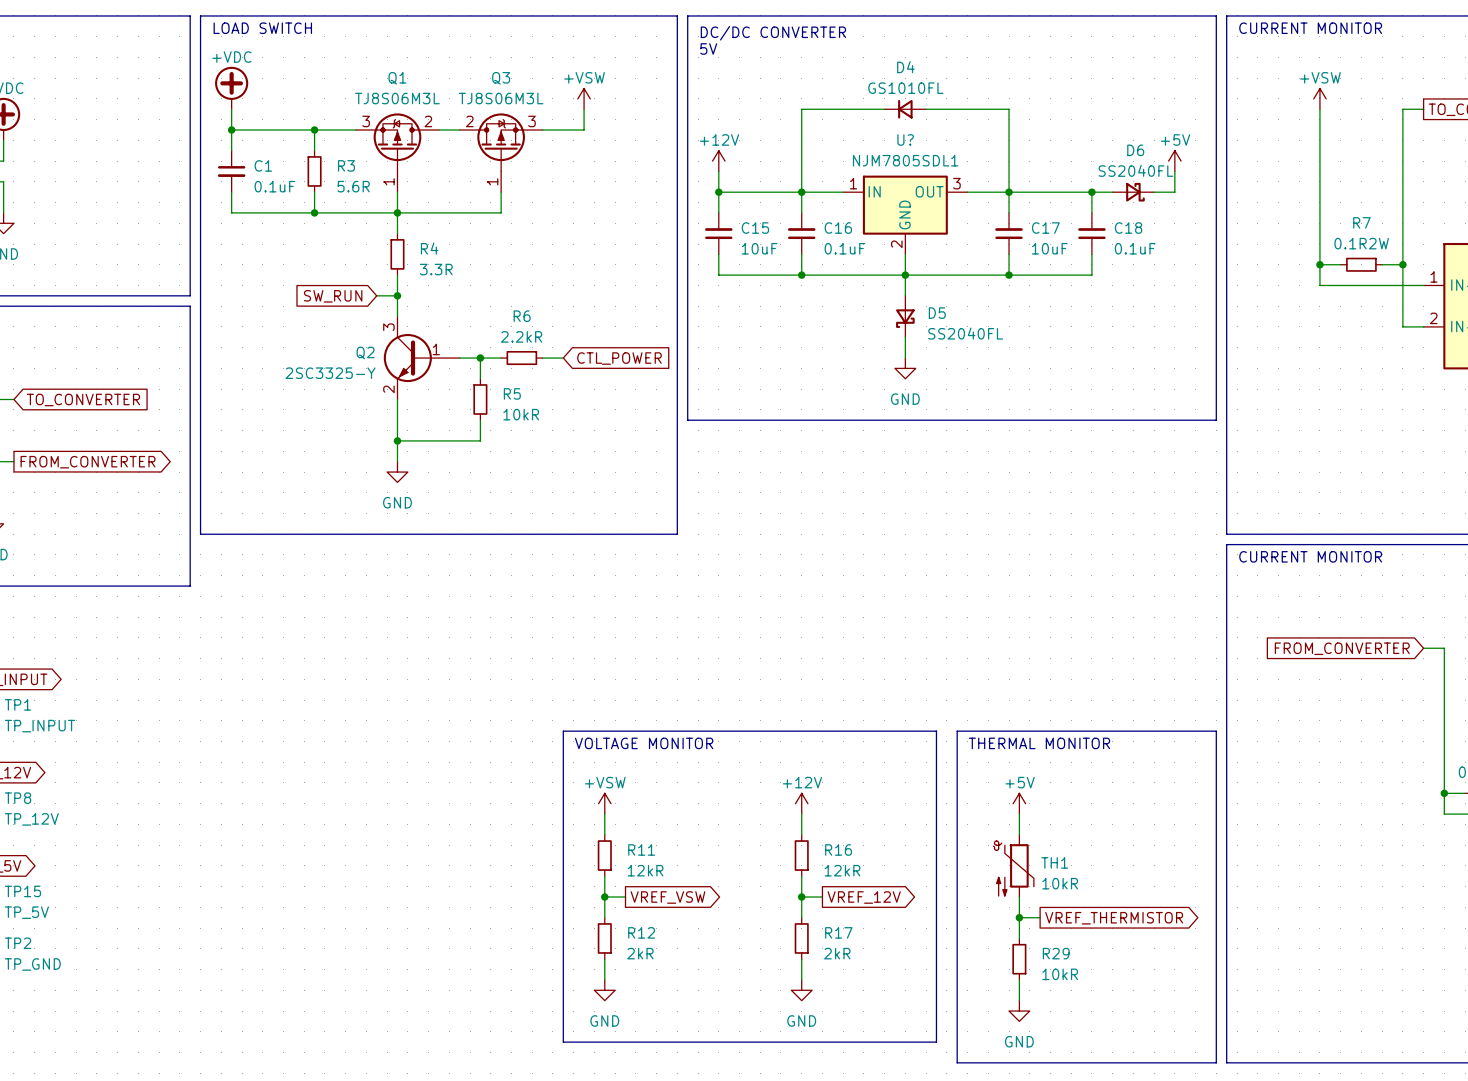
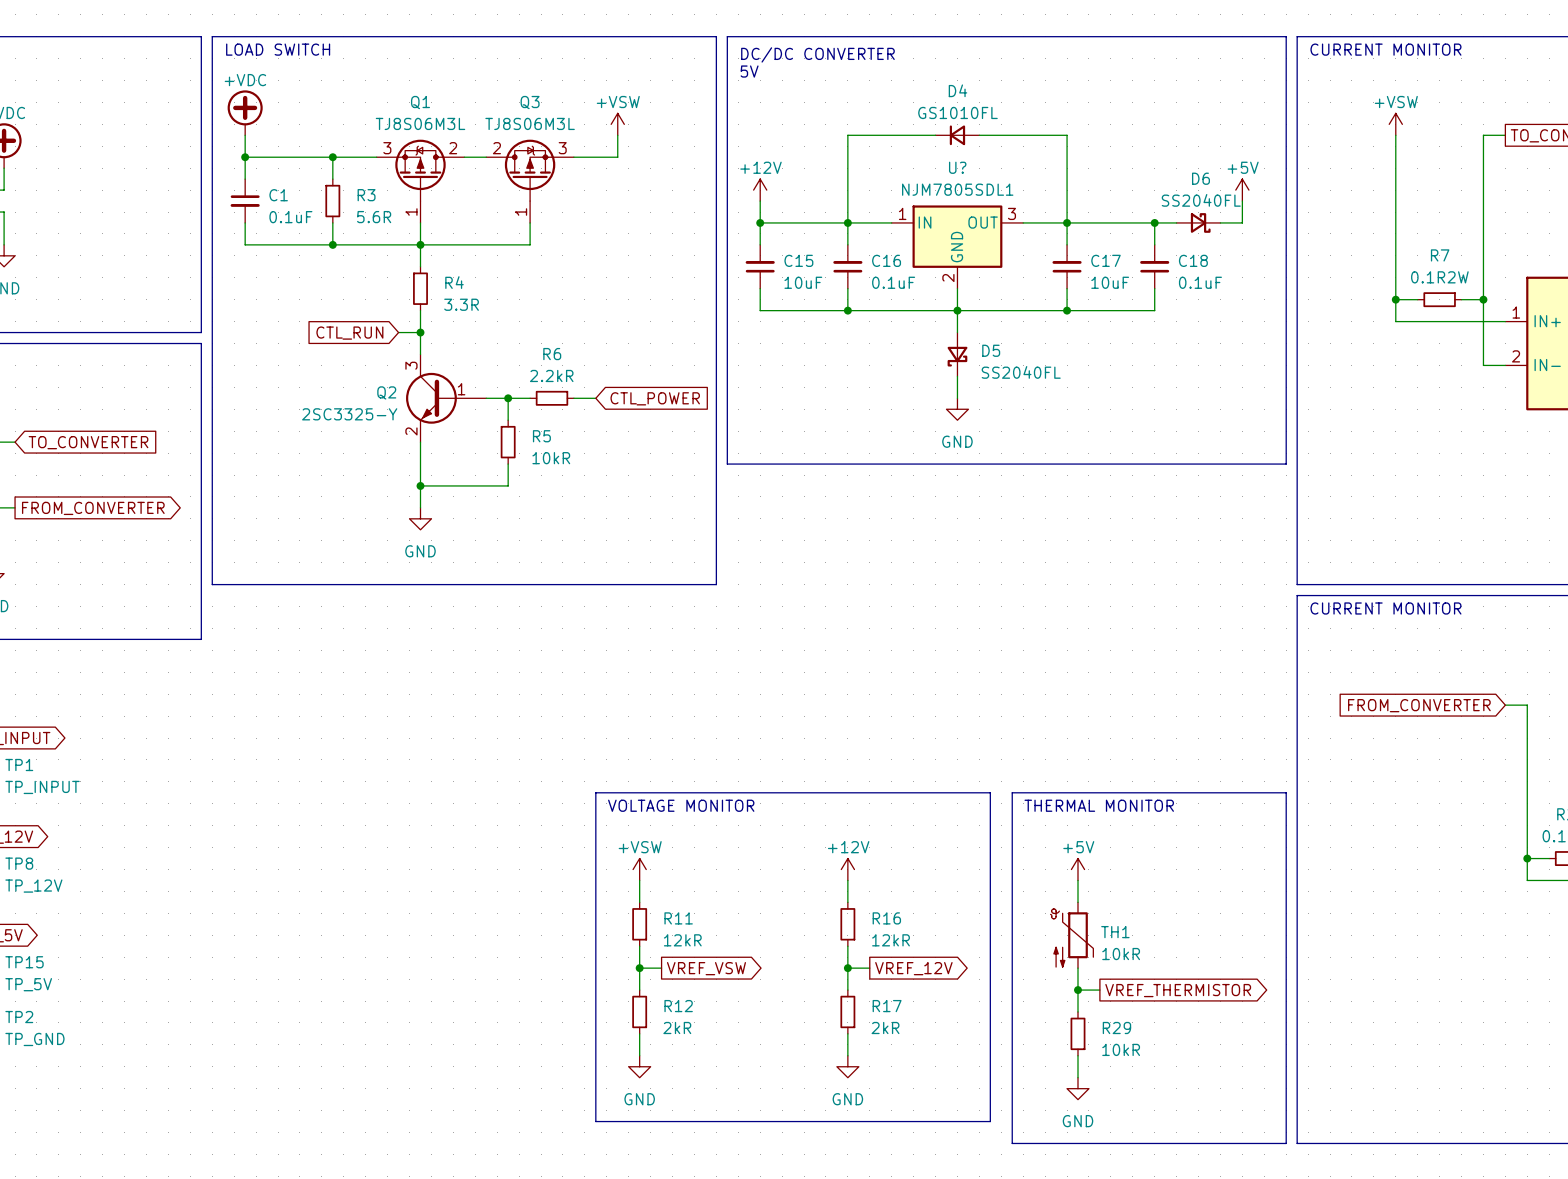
global label: SW_RUN (333, 296) -> CTL_RUN (349, 333)

